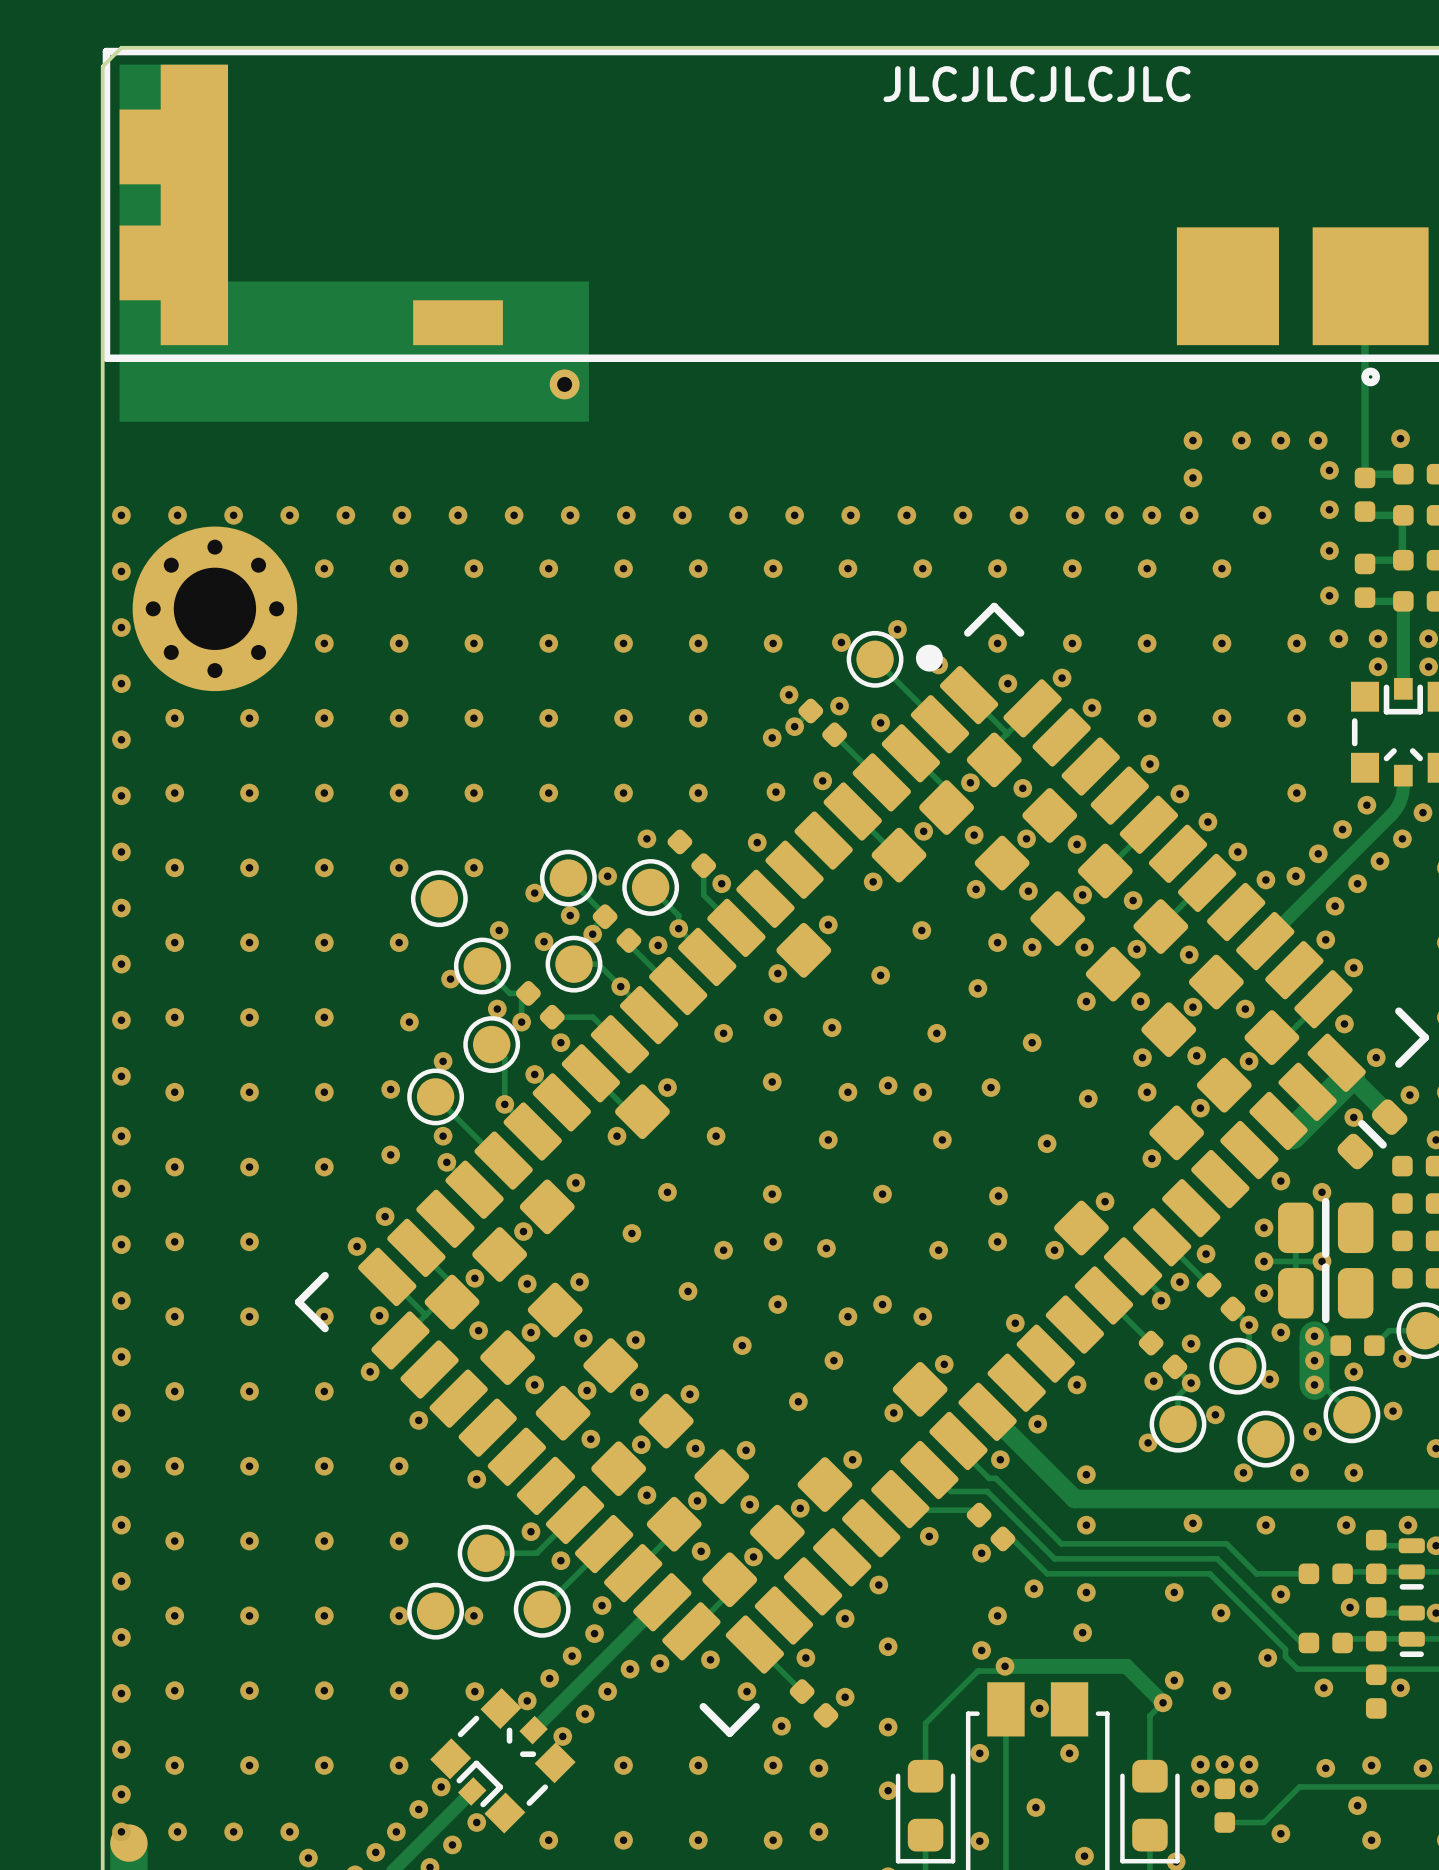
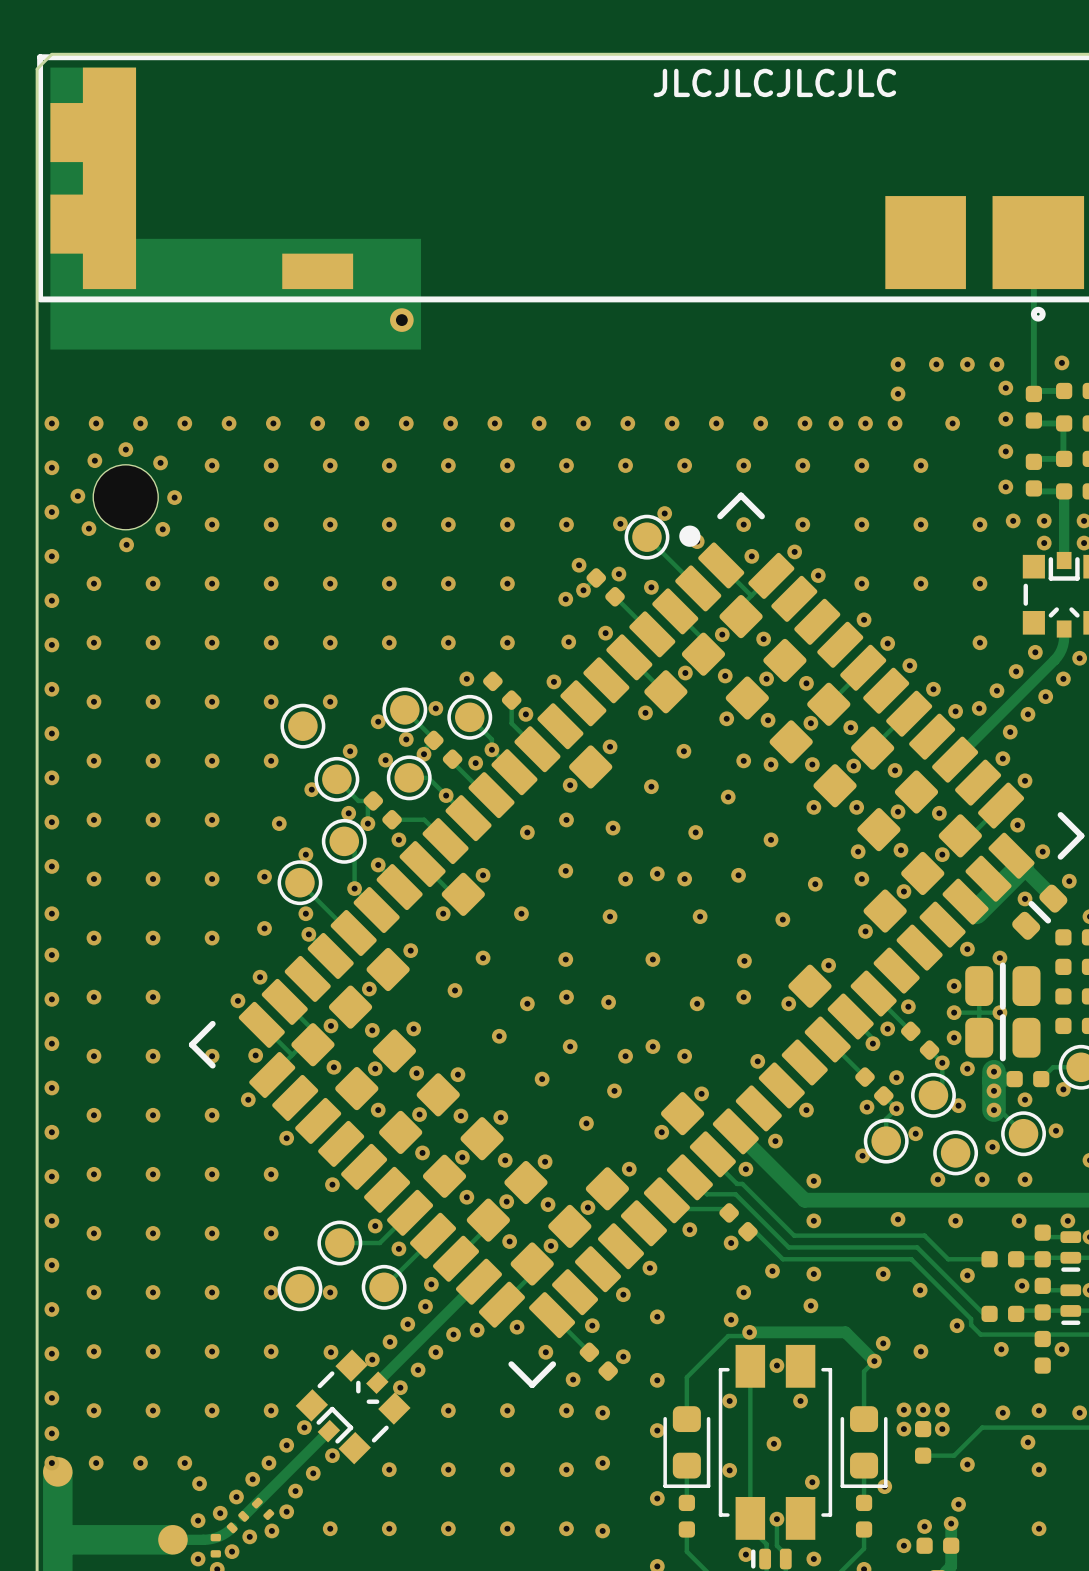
part footprint: [132, 526, 298, 692] -> [93, 464, 159, 530]
via: none -> (125, 449)
via: none -> (94, 460)
via: none -> (160, 462)
via: none -> (77, 496)
via: none -> (174, 497)
via: none -> (88, 528)
via: none -> (162, 529)
via: none -> (126, 544)

